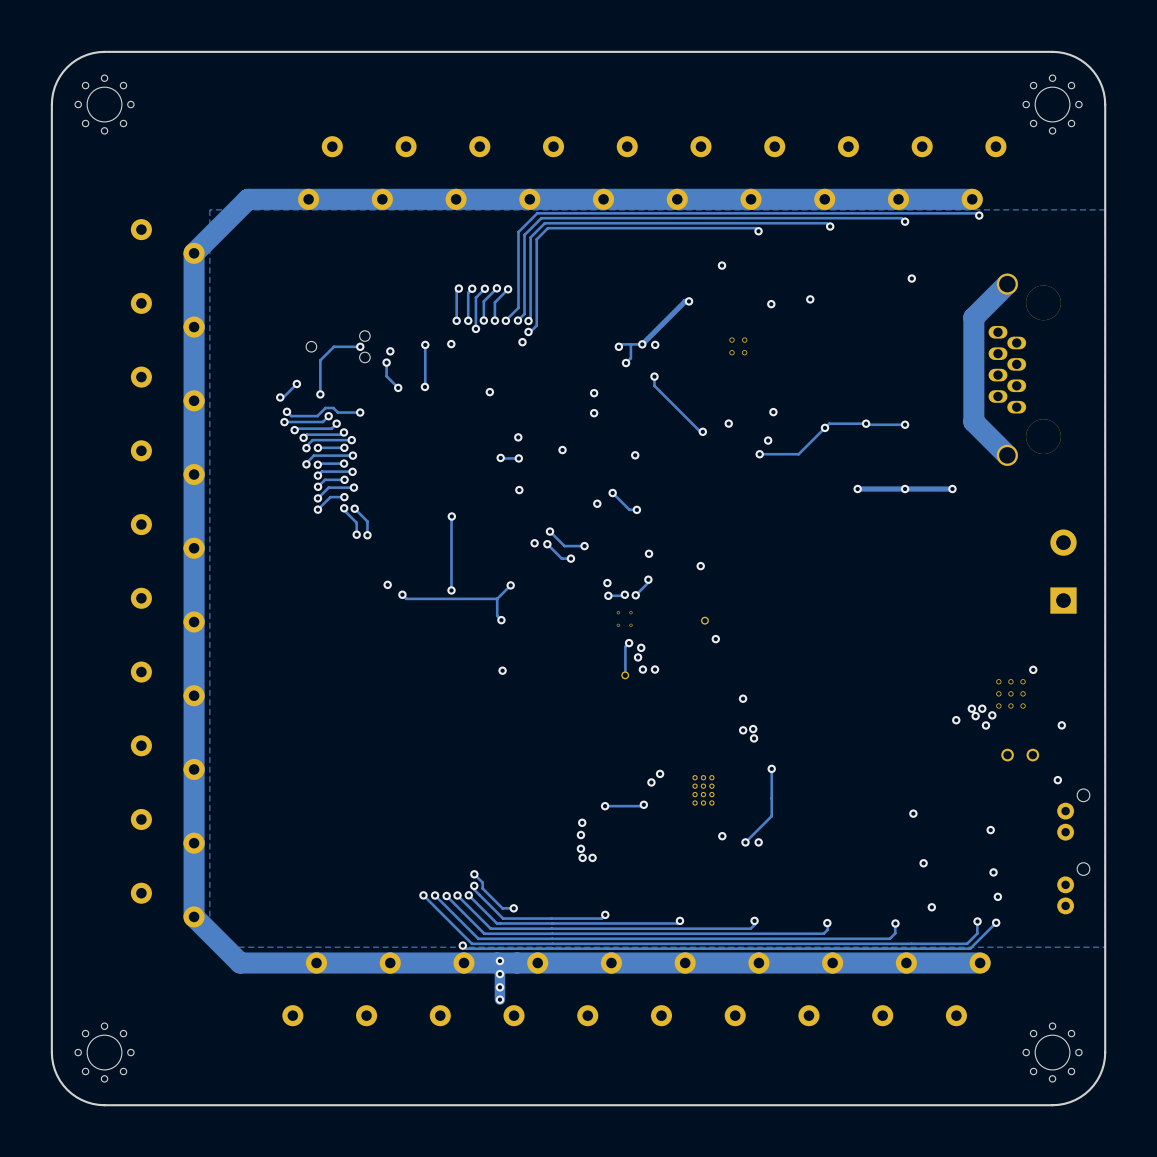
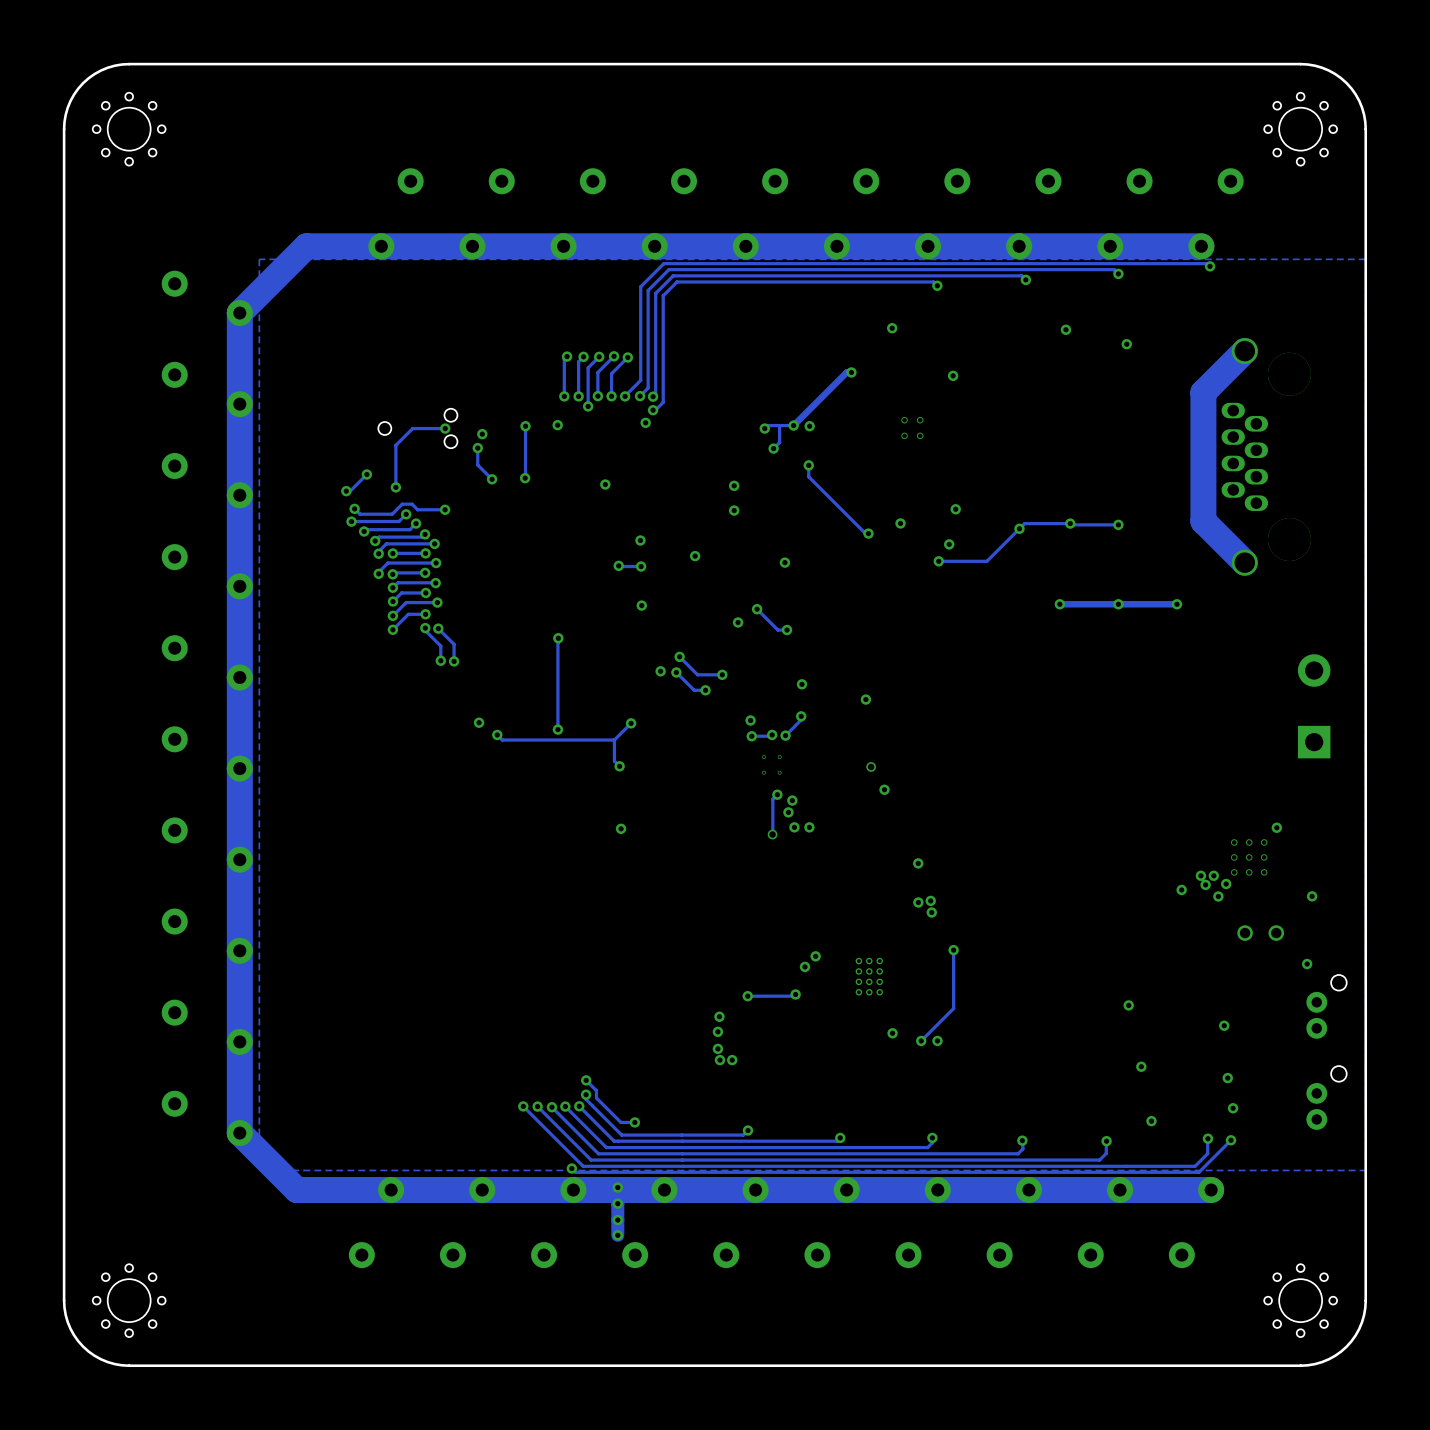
via position: (810, 299) -> (1065, 329)

